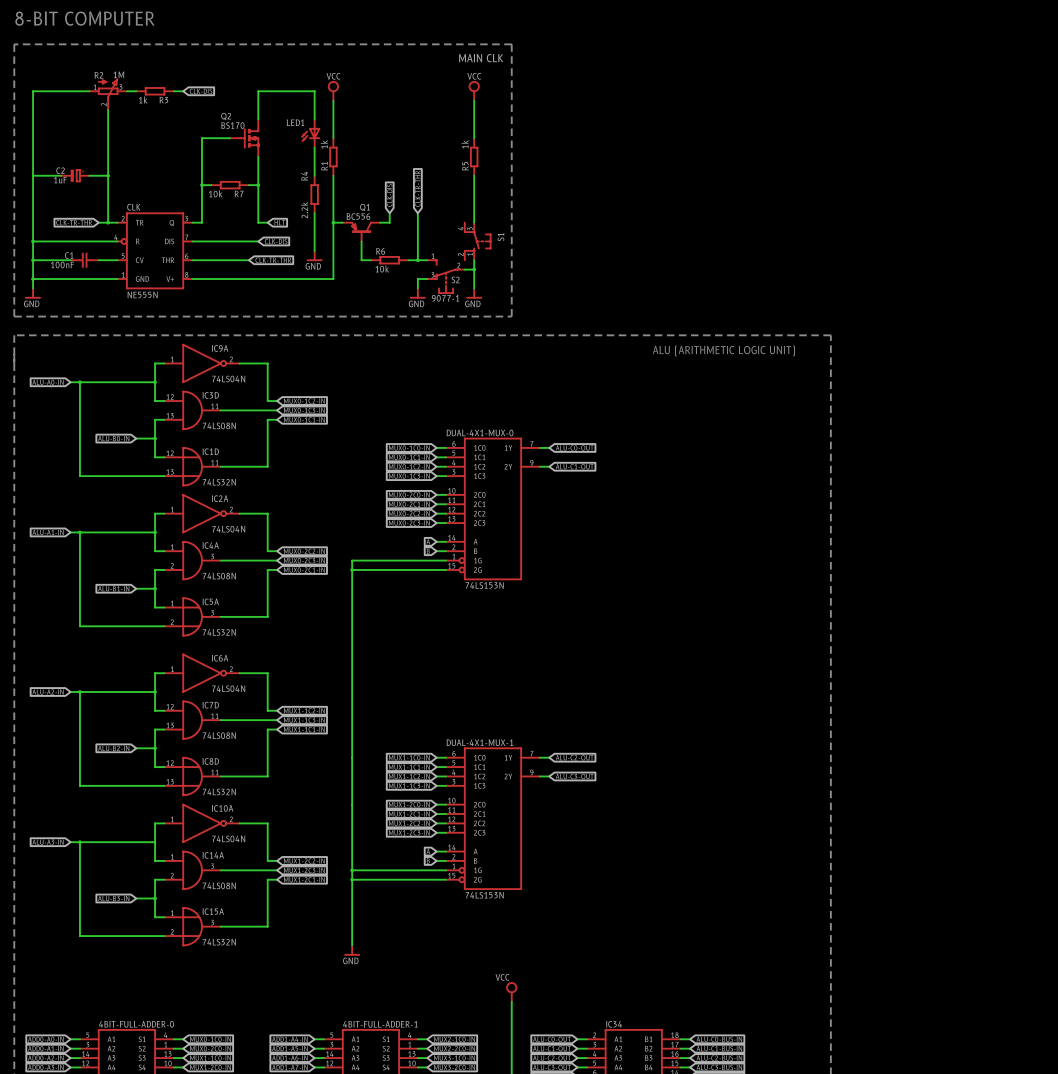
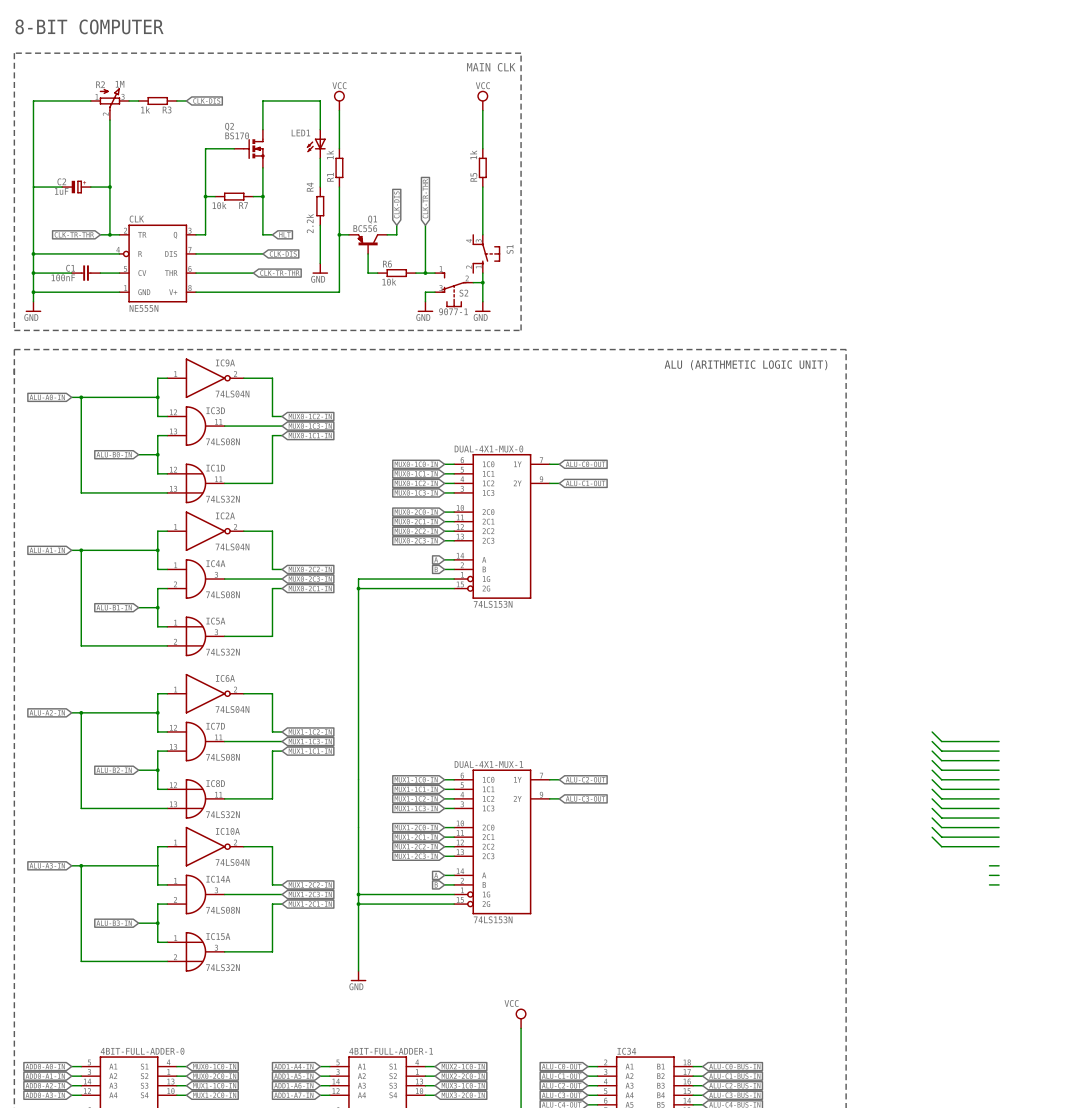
wire: none -> (932, 731) (941, 741) (999, 741)
wire: none -> (932, 741) (941, 751) (999, 751)
wire: none -> (932, 751) (941, 760) (999, 760)
wire: none -> (932, 760) (941, 770) (999, 770)
wire: none -> (932, 770) (941, 779) (999, 779)
wire: none -> (932, 779) (941, 789) (999, 789)
wire: none -> (932, 789) (941, 798) (999, 798)
wire: none -> (932, 798) (941, 808) (999, 808)
wire: none -> (932, 808) (941, 818) (999, 818)
wire: none -> (932, 818) (941, 827) (999, 827)
wire: none -> (932, 827) (941, 837) (999, 837)
wire: none -> (932, 837) (941, 846) (999, 846)
wire: none -> (989, 865) (999, 865)
wire: none -> (989, 875) (999, 875)
wire: none -> (989, 884) (999, 884)

